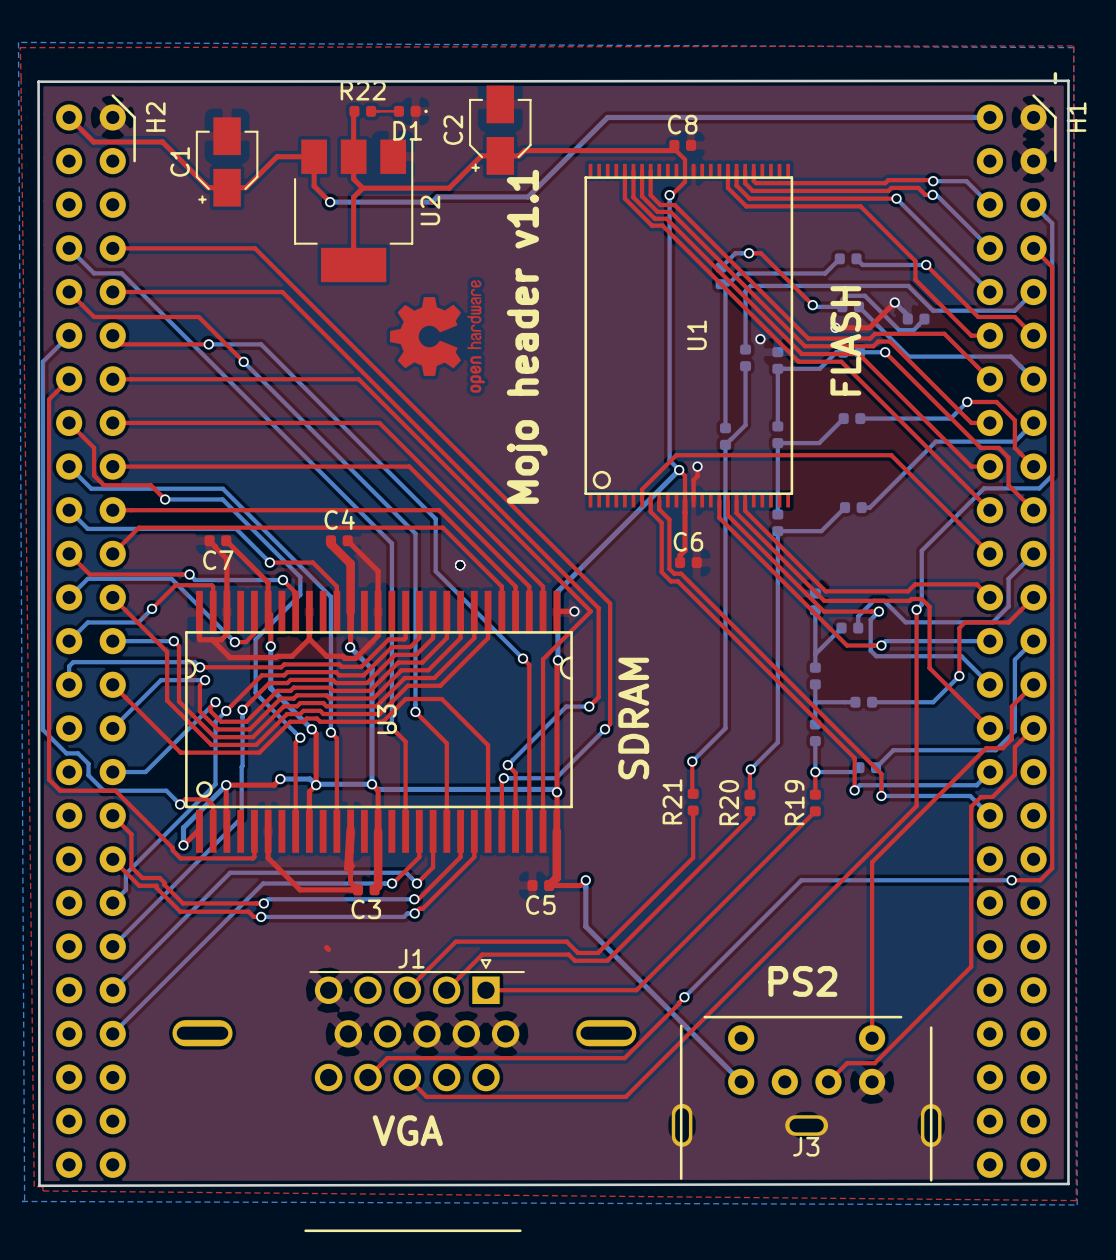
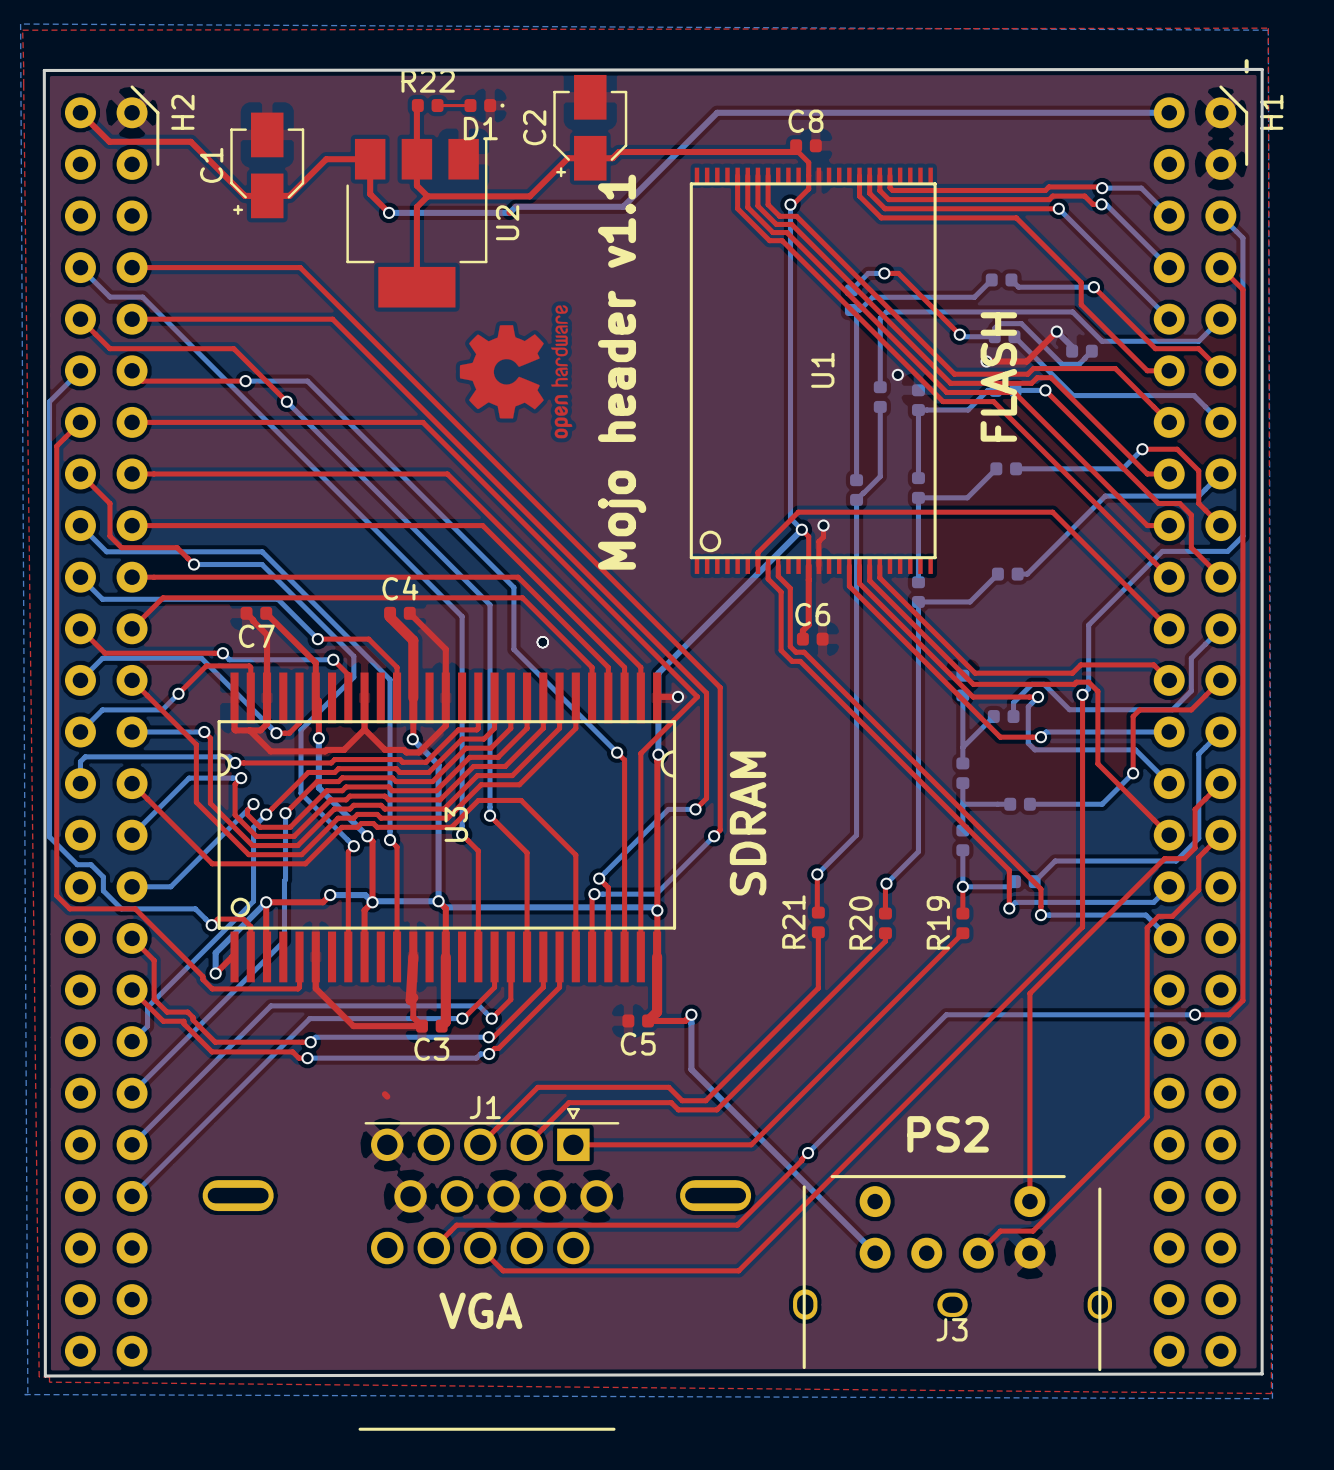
J3 footprint: [671, 1015, 942, 1182] -> [793, 1175, 1113, 1372]

